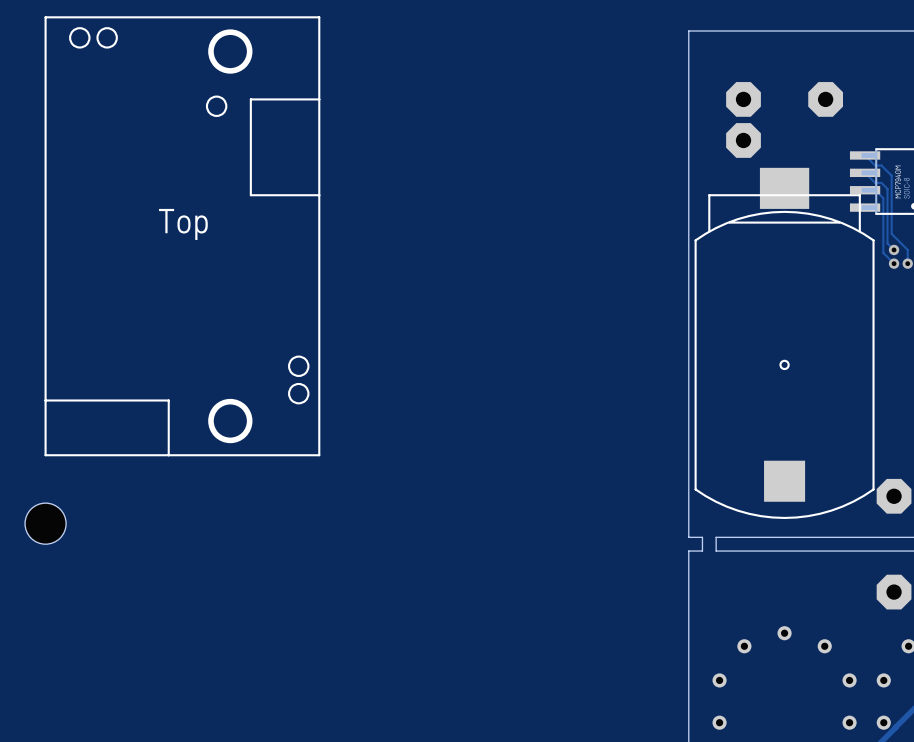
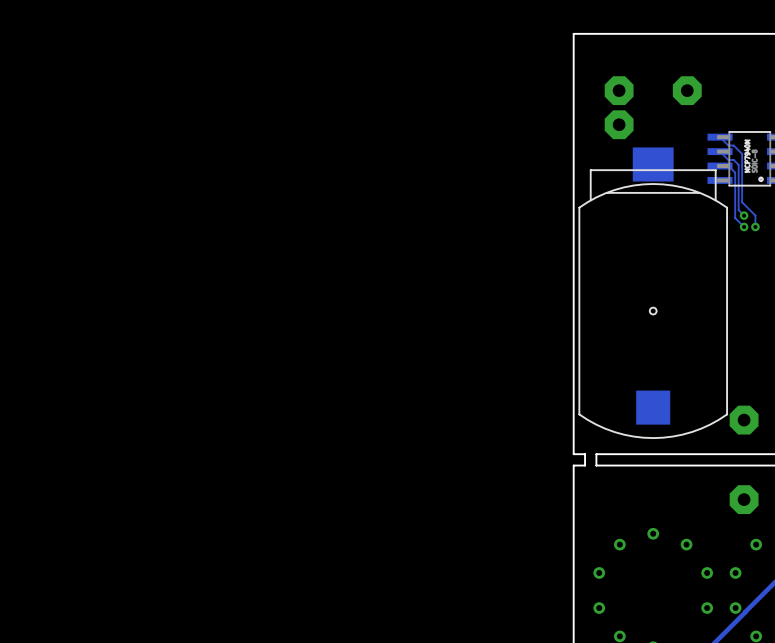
line: (319, 17) (319, 455) (45, 455) (45, 17) (319, 17) -> none
drawing: [69, 27, 118, 49] -> none
drawing: [208, 29, 253, 74] -> none
drawing: [205, 95, 228, 117] -> none
line: (319, 99) (250, 99) (250, 195) (319, 195) -> none
text: Top (183, 224) -> none
drawing: [288, 355, 310, 405] -> none
drawing: [208, 398, 253, 444] -> none
line: (45, 400) (168, 400) (168, 455) -> none
hole: (45, 523) -> none

